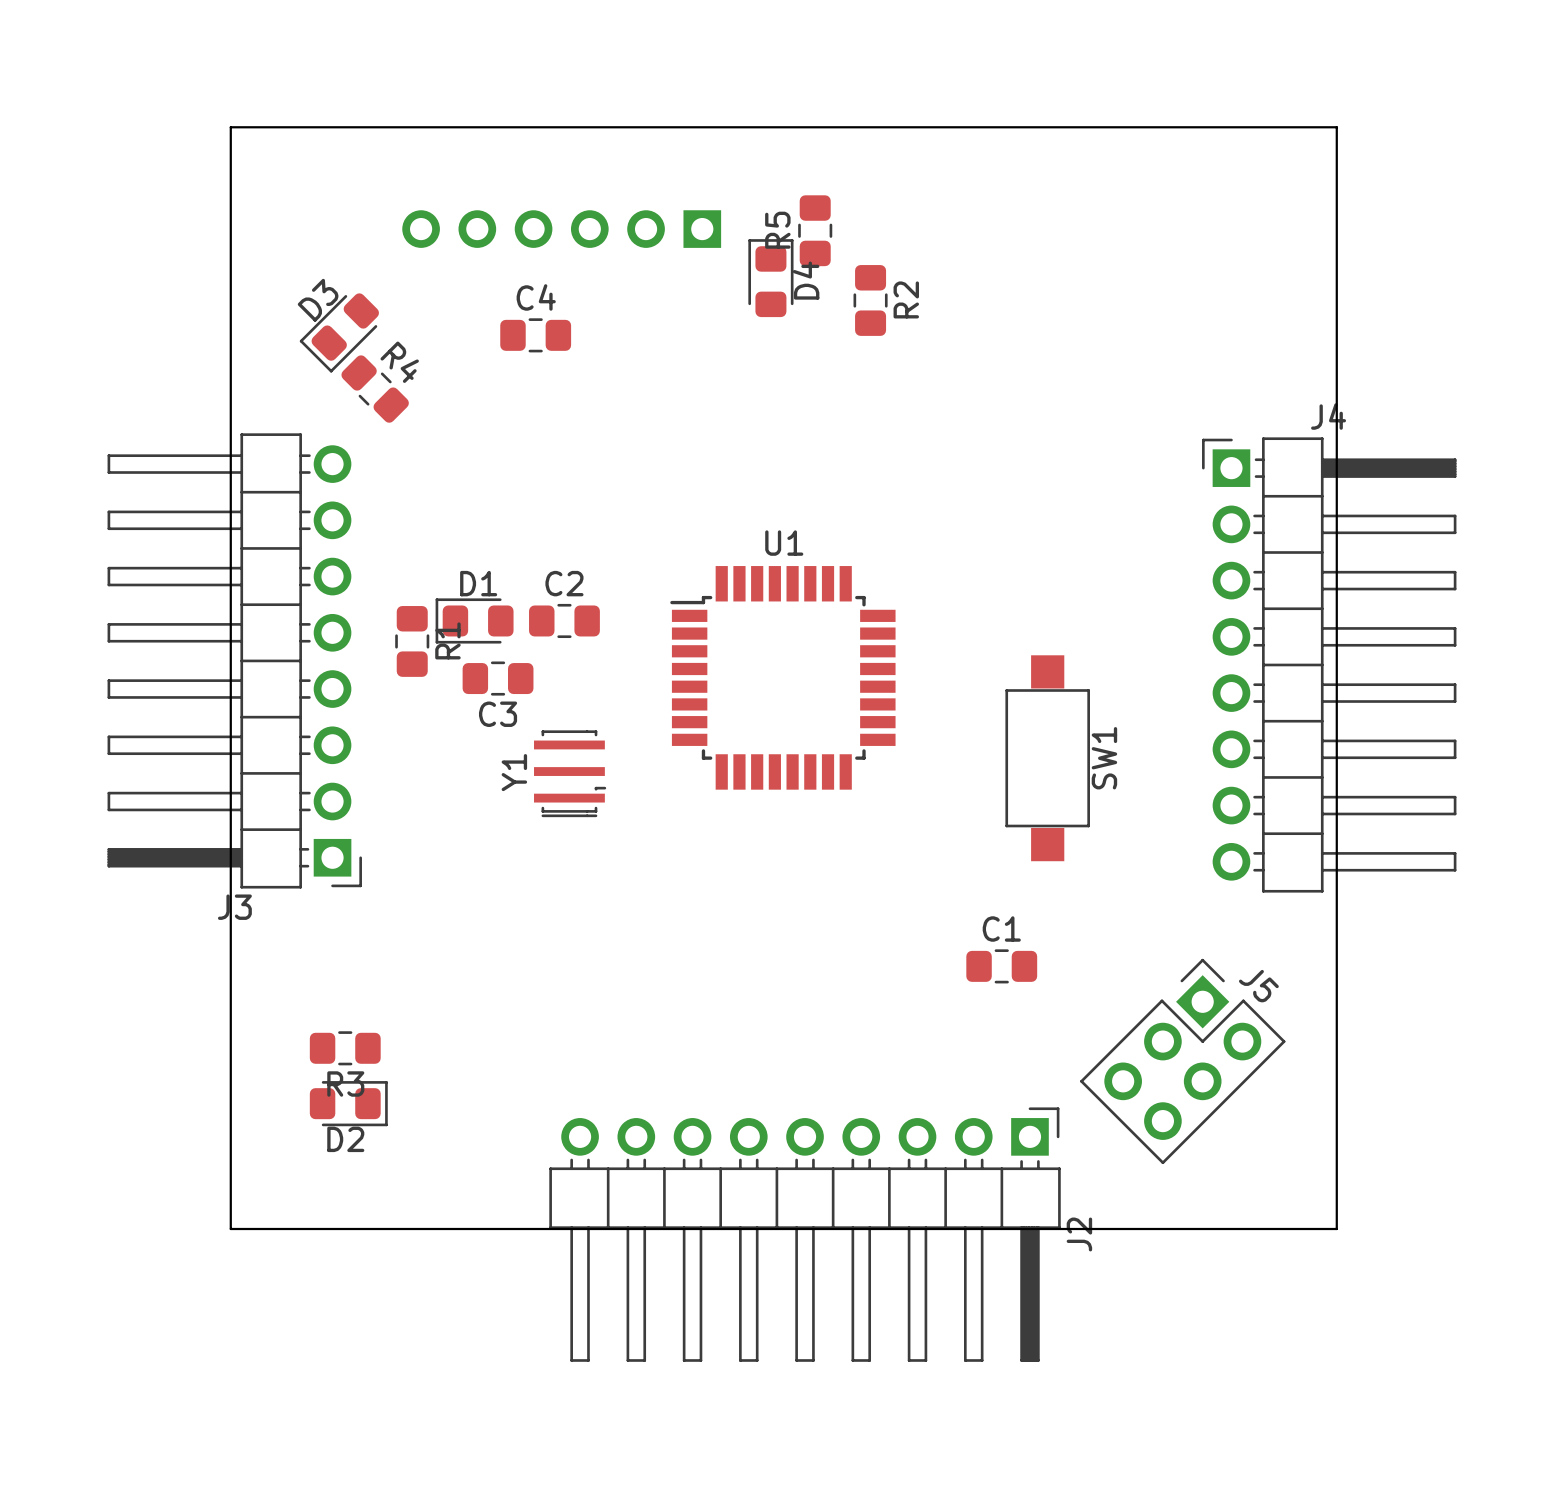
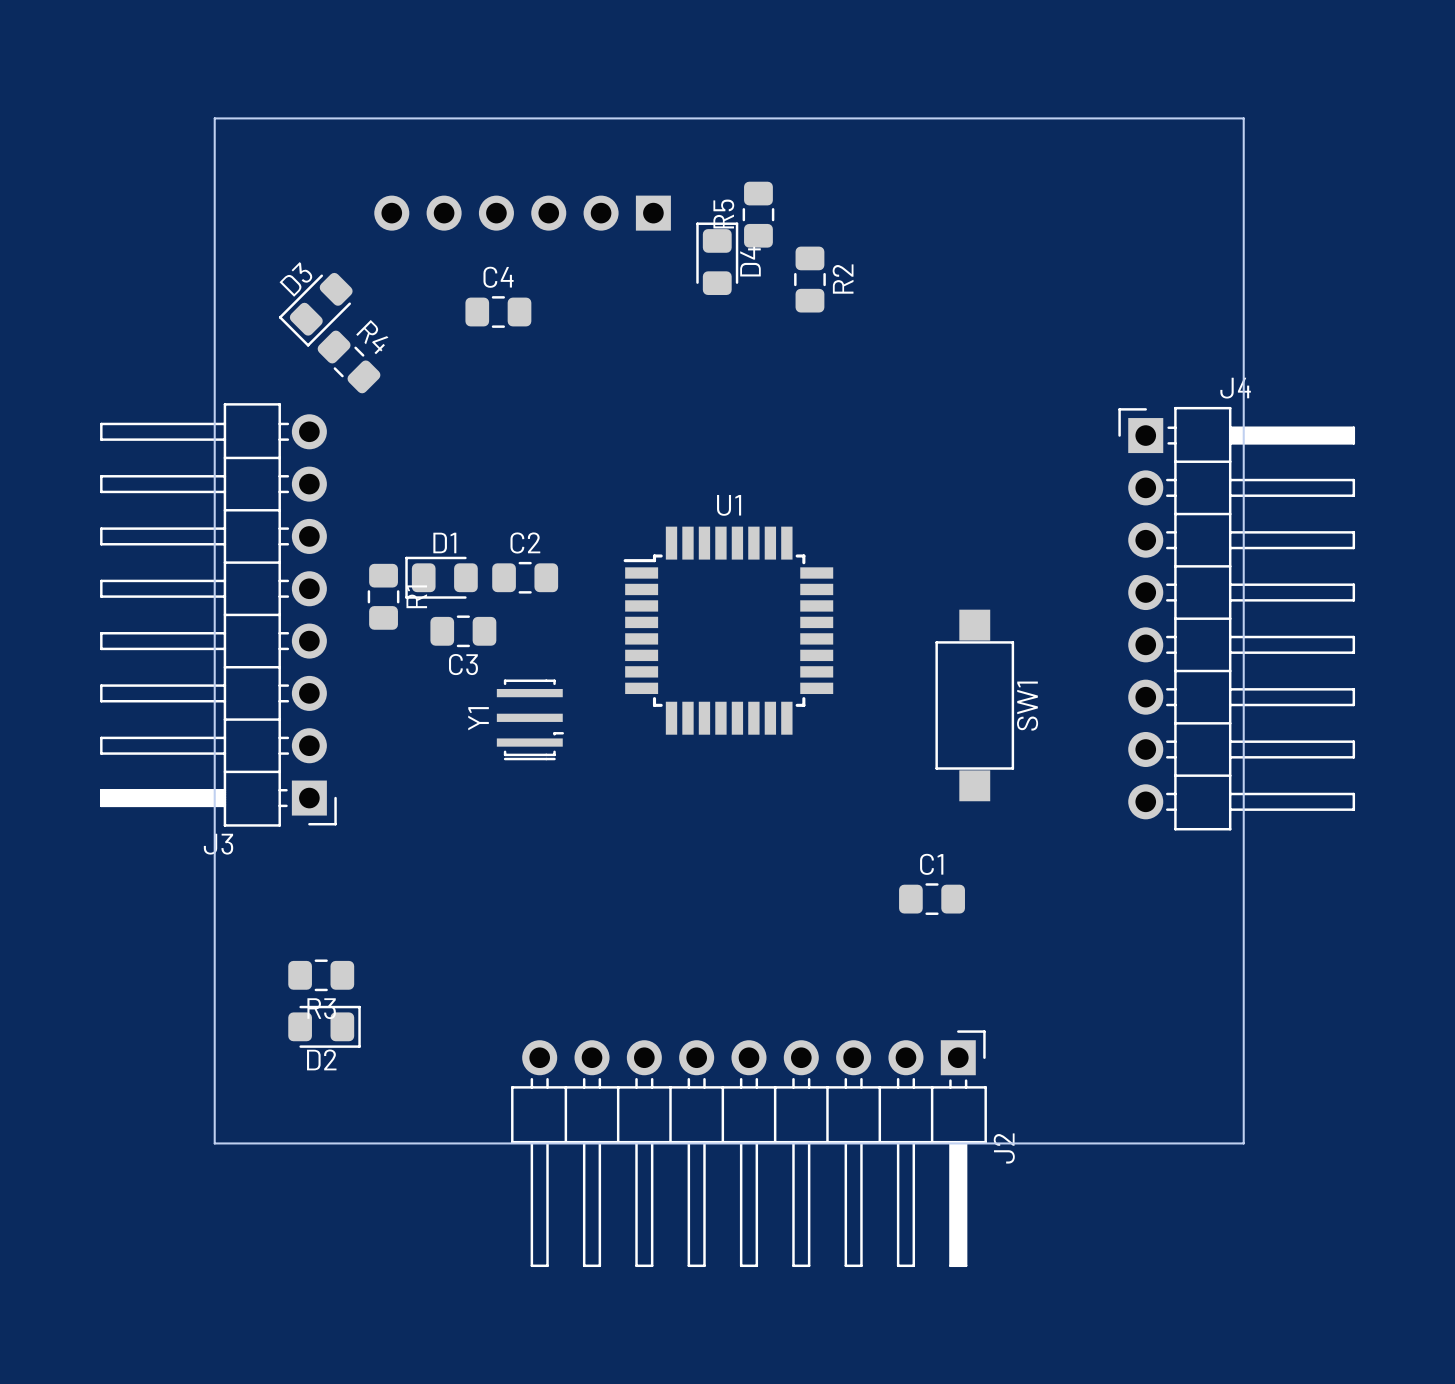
J5: (1182, 1061) -> none

